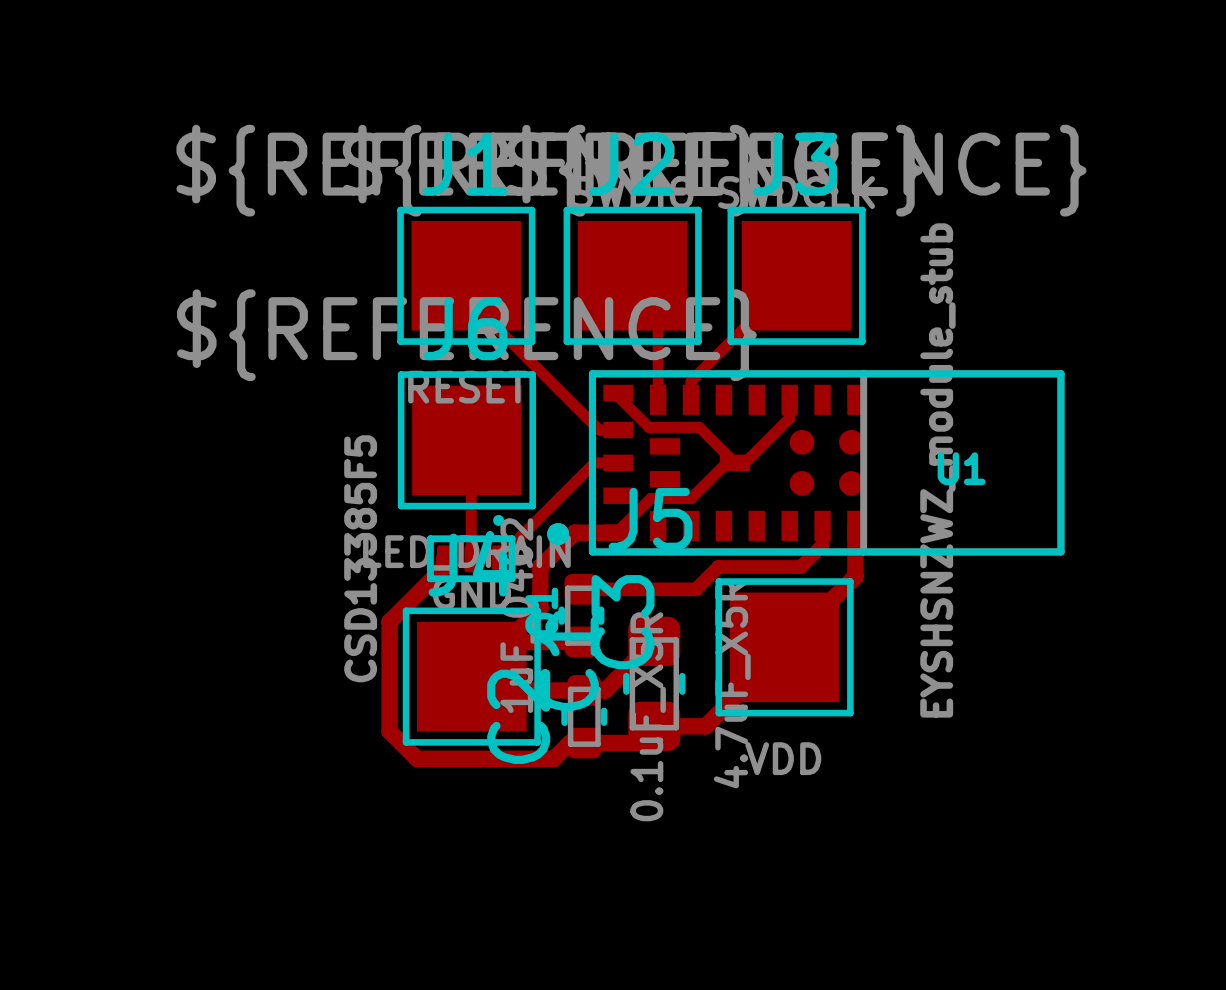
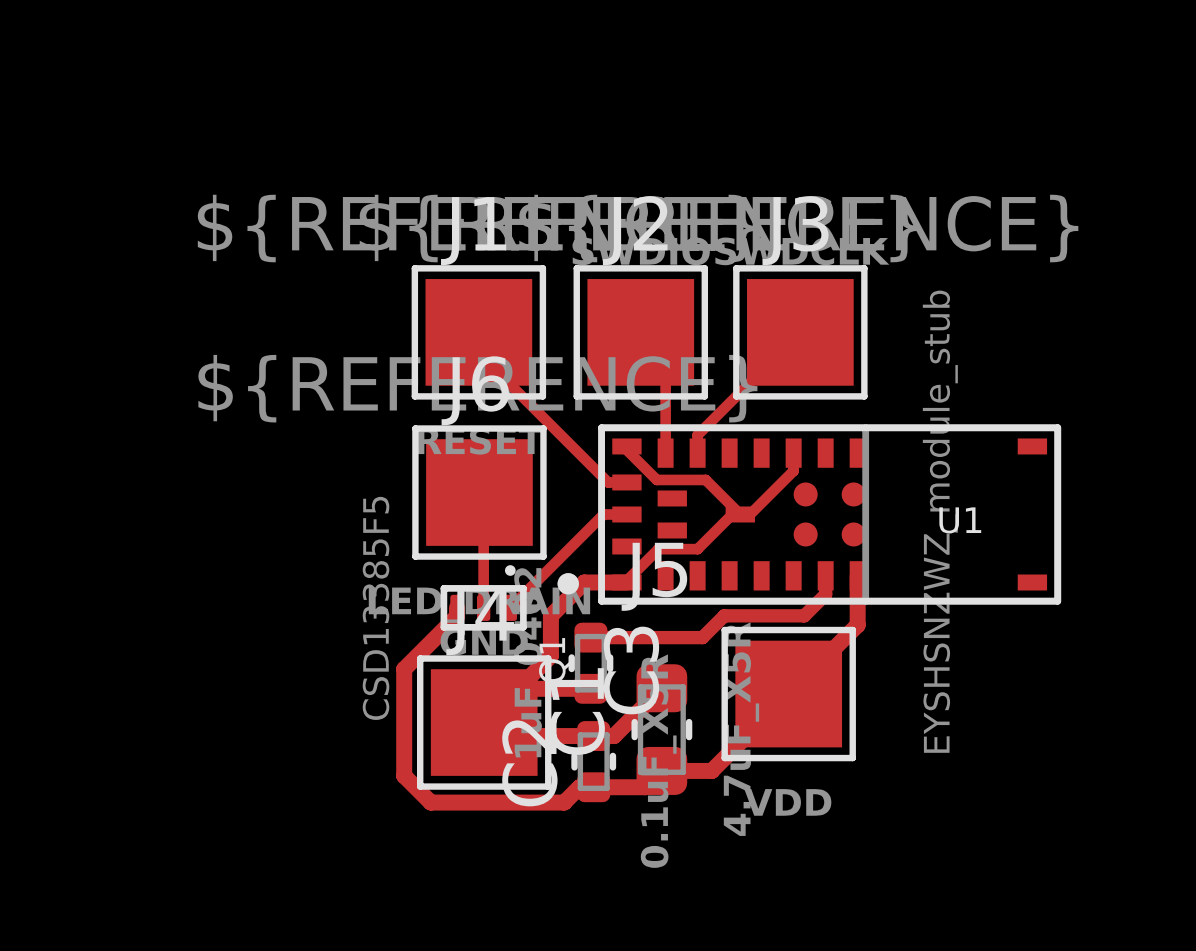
U1 footprint: [547, 370, 1065, 556] -> [557, 424, 1062, 605]

